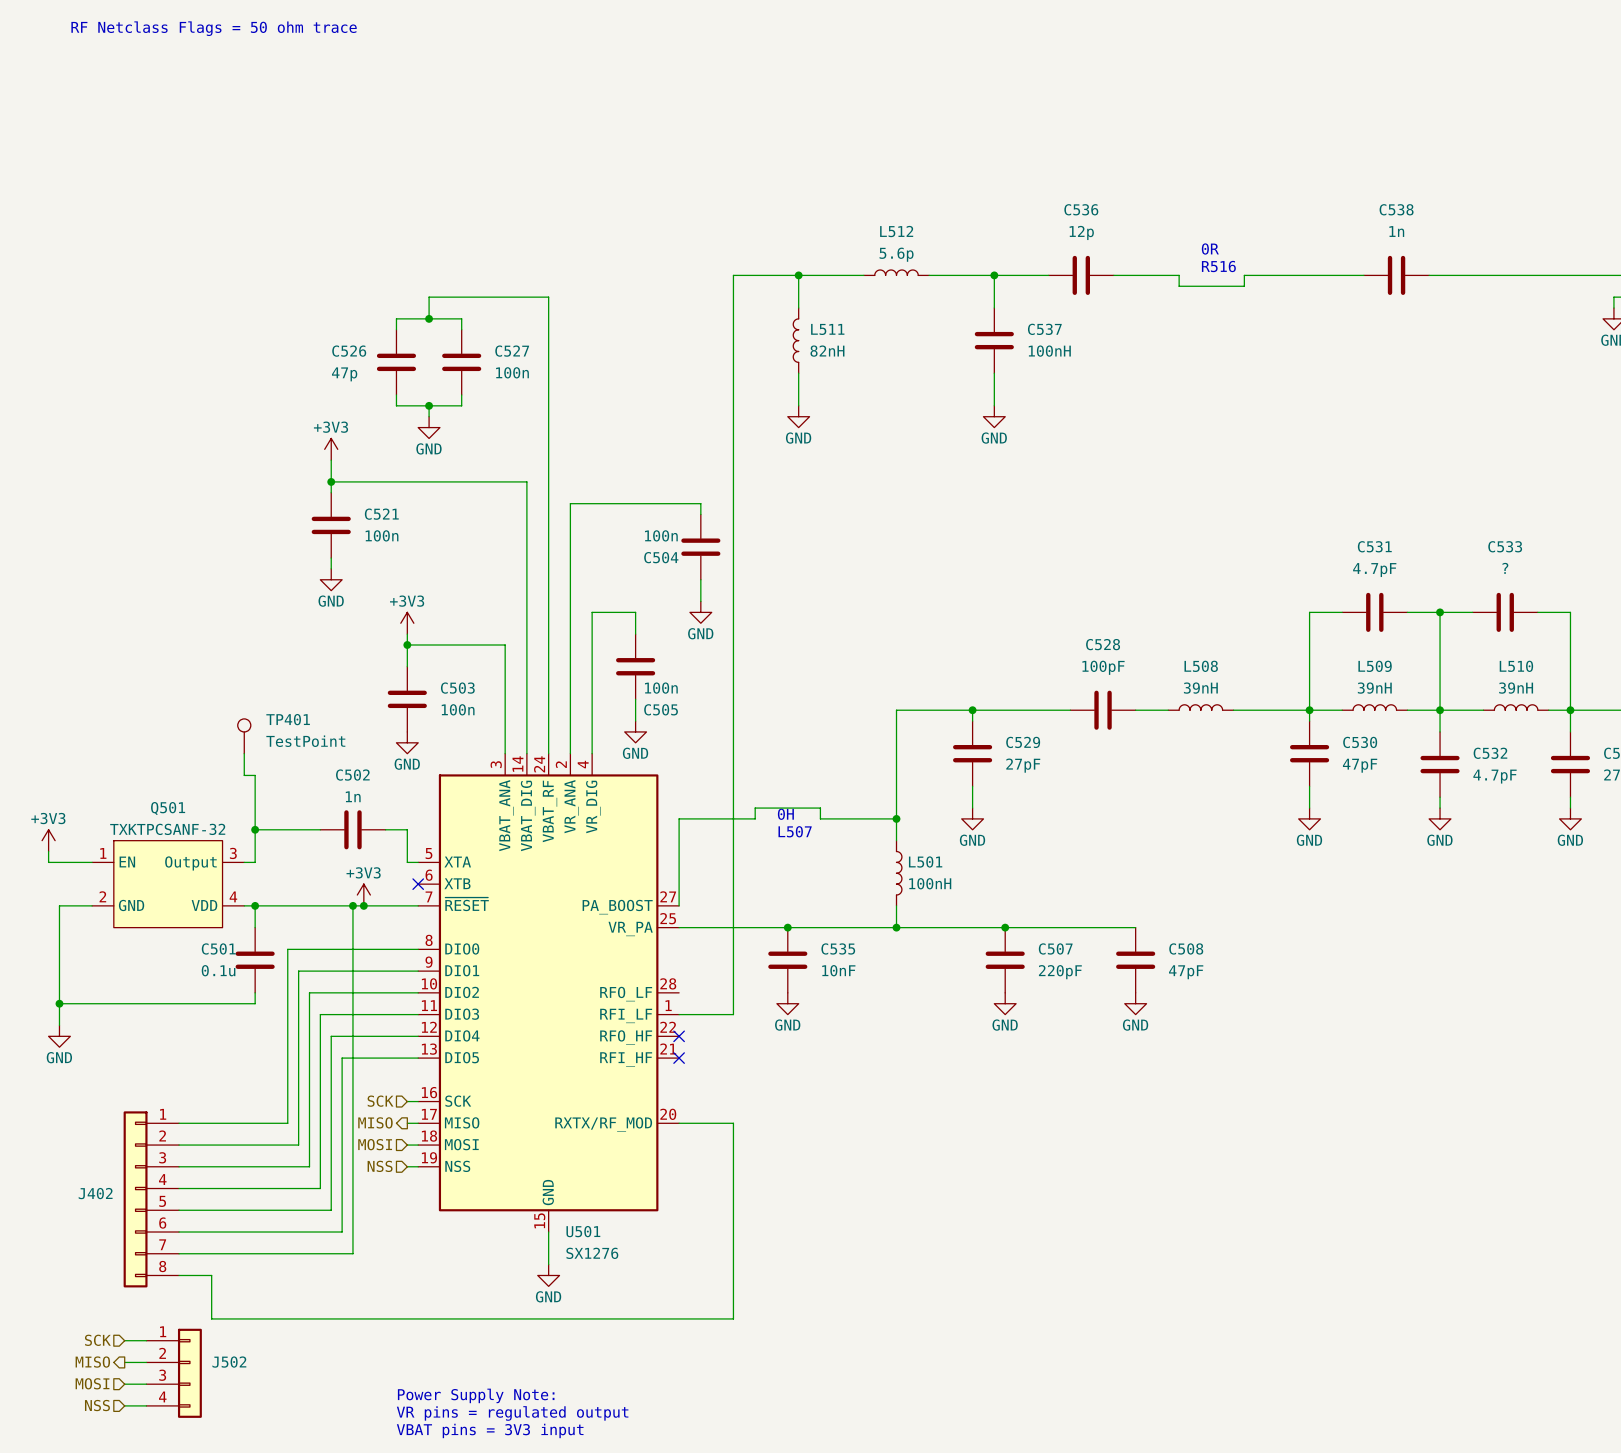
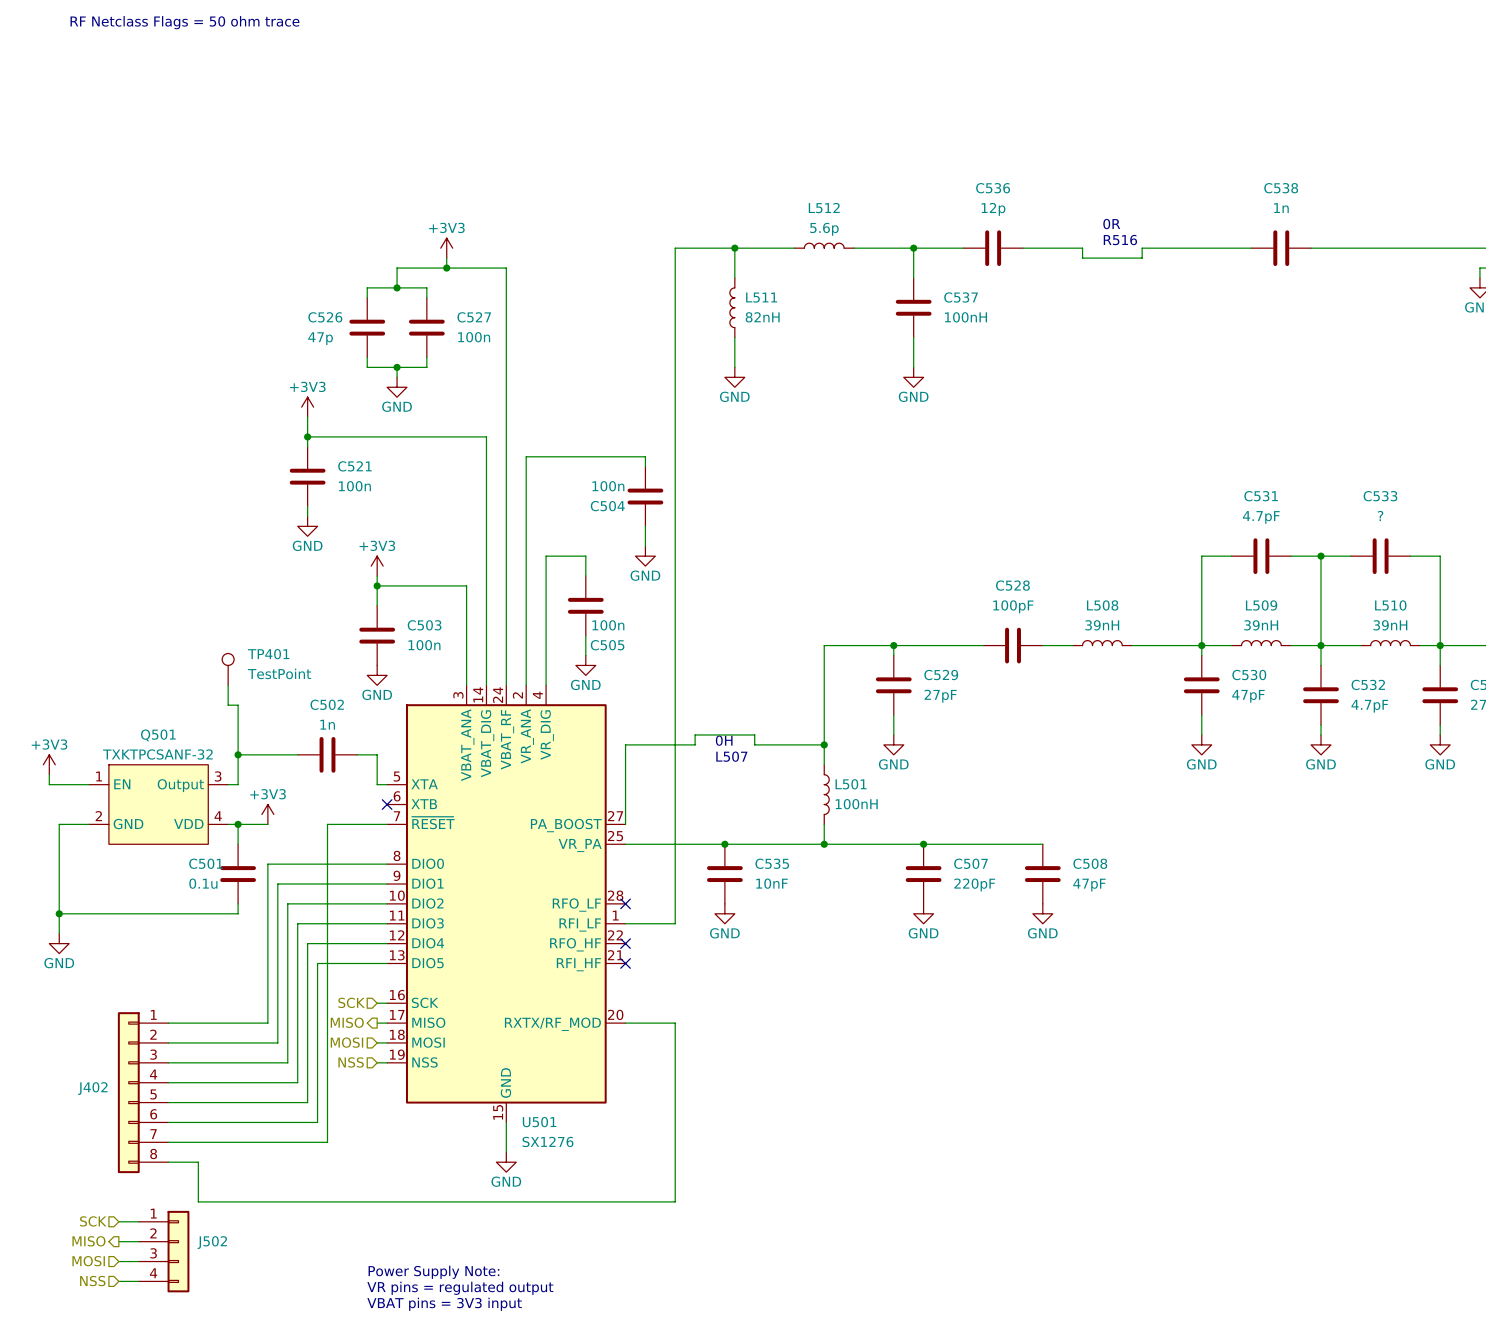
power symbol: none -> +3V3 (446, 248)
wire: none -> (446, 258) (446, 268)
junction: none -> (446, 268)
power symbol position: +3V3 (363, 895) -> +3V3 (267, 814)
wire: (287, 905) (352, 905) -> none
junction: (352, 905) -> none
junction: (363, 905) -> none
no-connect mark: none -> (625, 903)

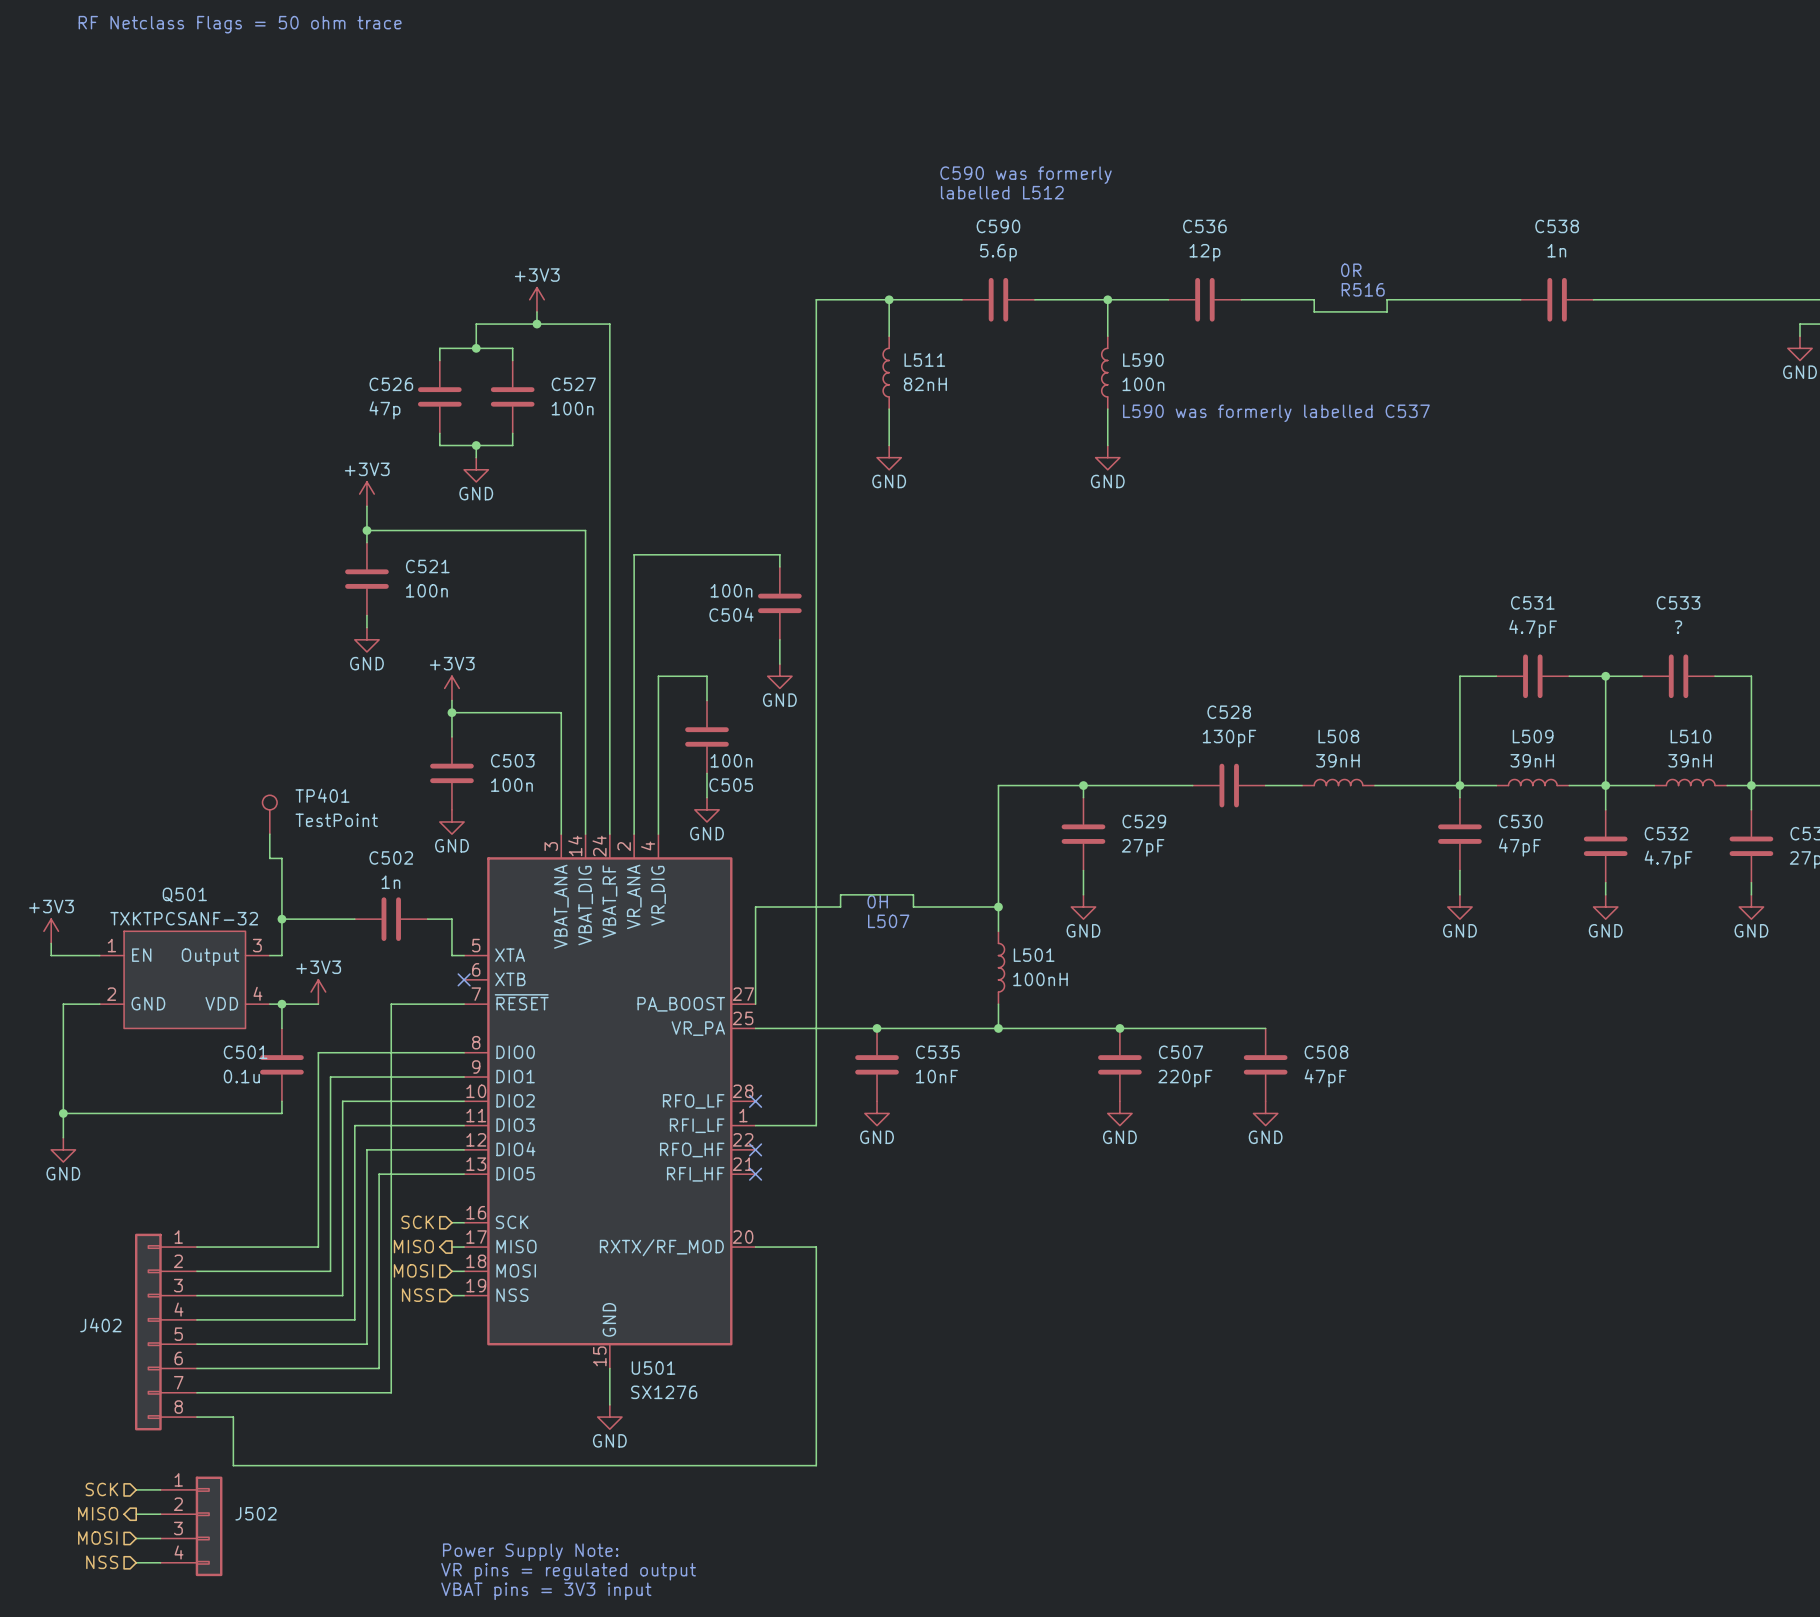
text: none -> C590 was formerly (1026, 175)
text: none -> labelled L512 (1002, 192)
L512: 5.6p (824, 245) -> none
C590: none -> 5.6p (998, 299)
L590: none -> 100n (1104, 372)
C537: 100nH (913, 307) -> none
text: none -> L590 was formerly labelled C537 (1276, 413)
C528 value: 100pF (1013, 606) -> 130pF (1229, 738)

